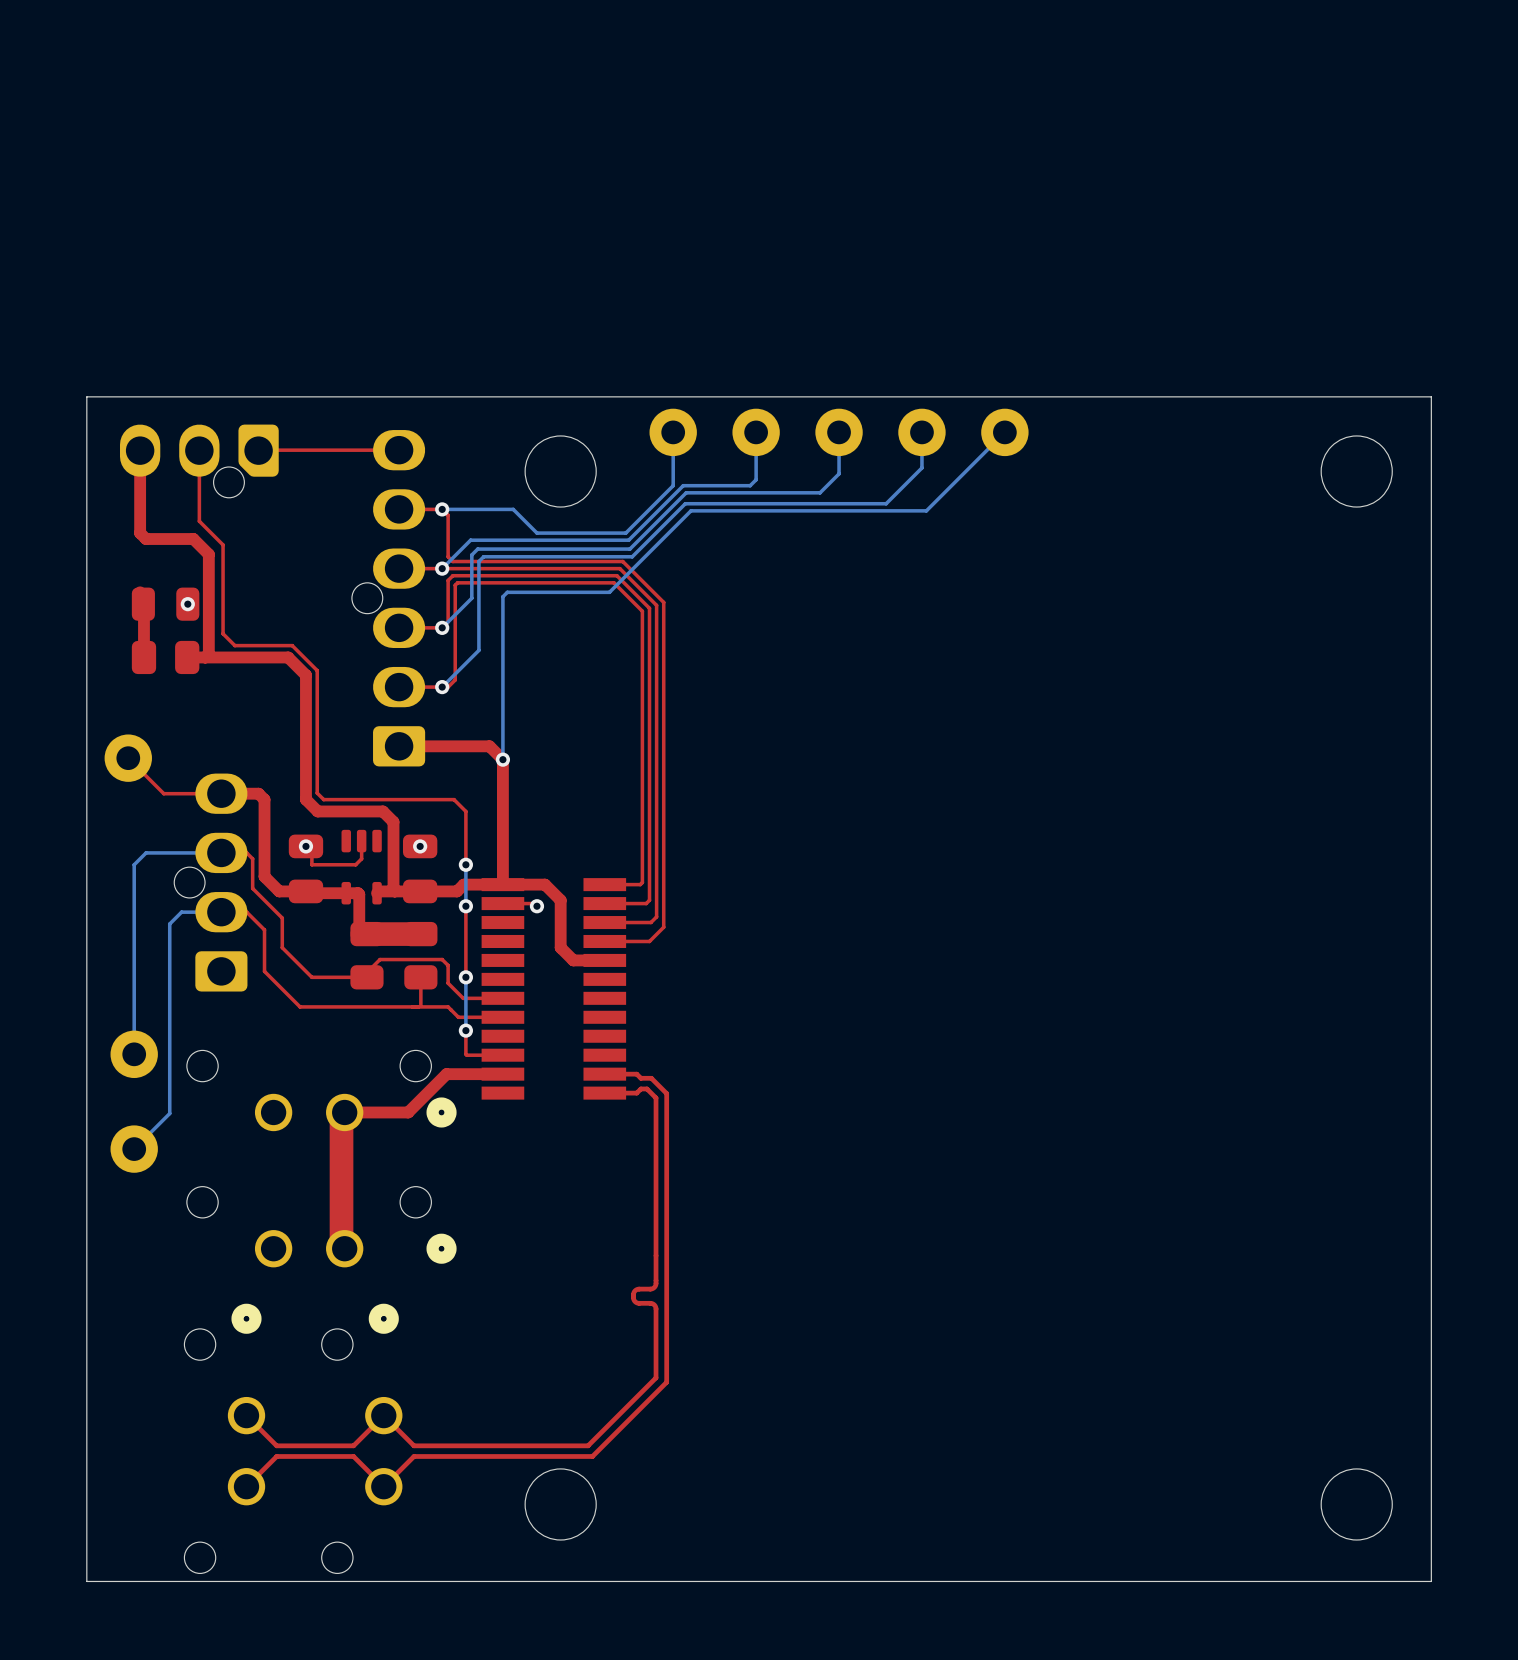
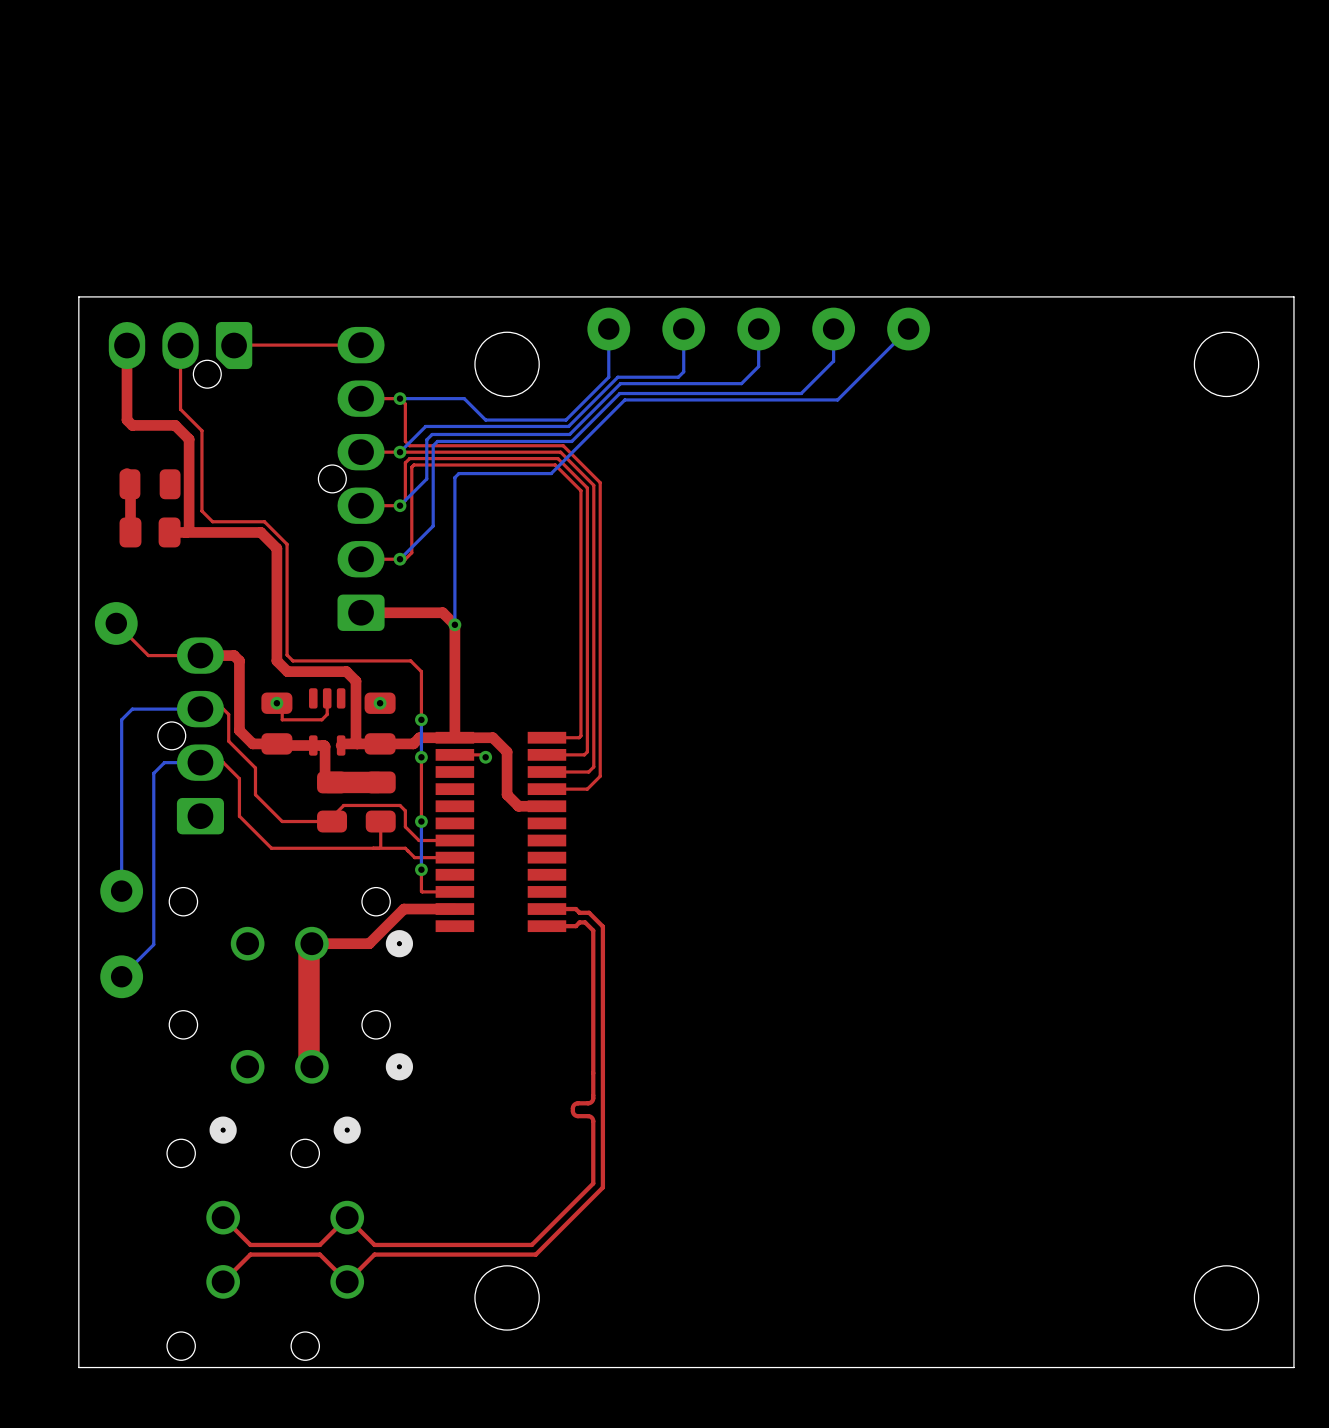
via: (187, 604) -> none

